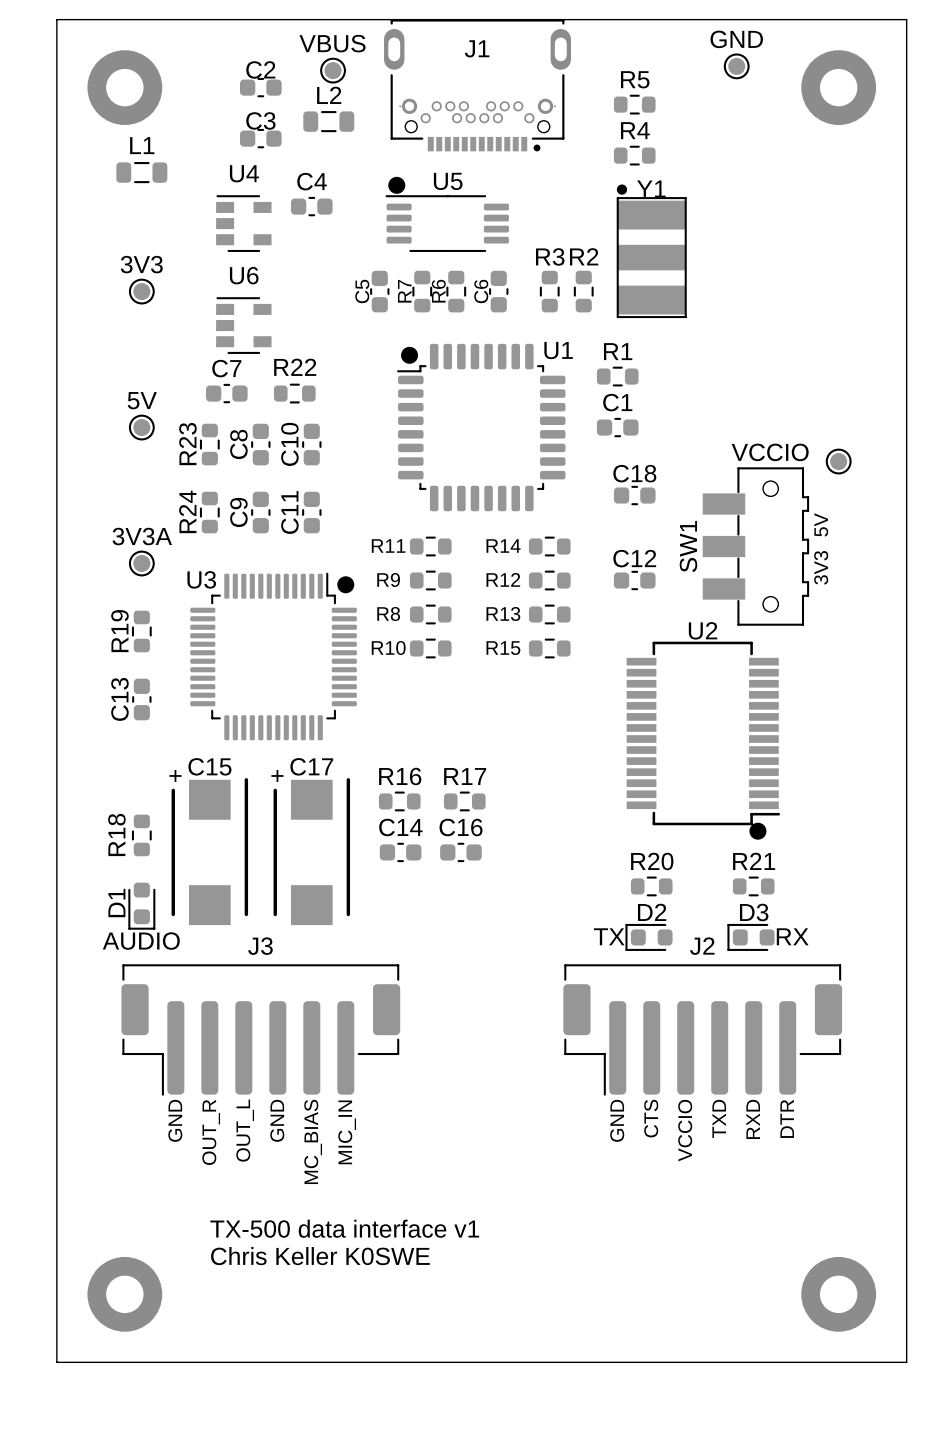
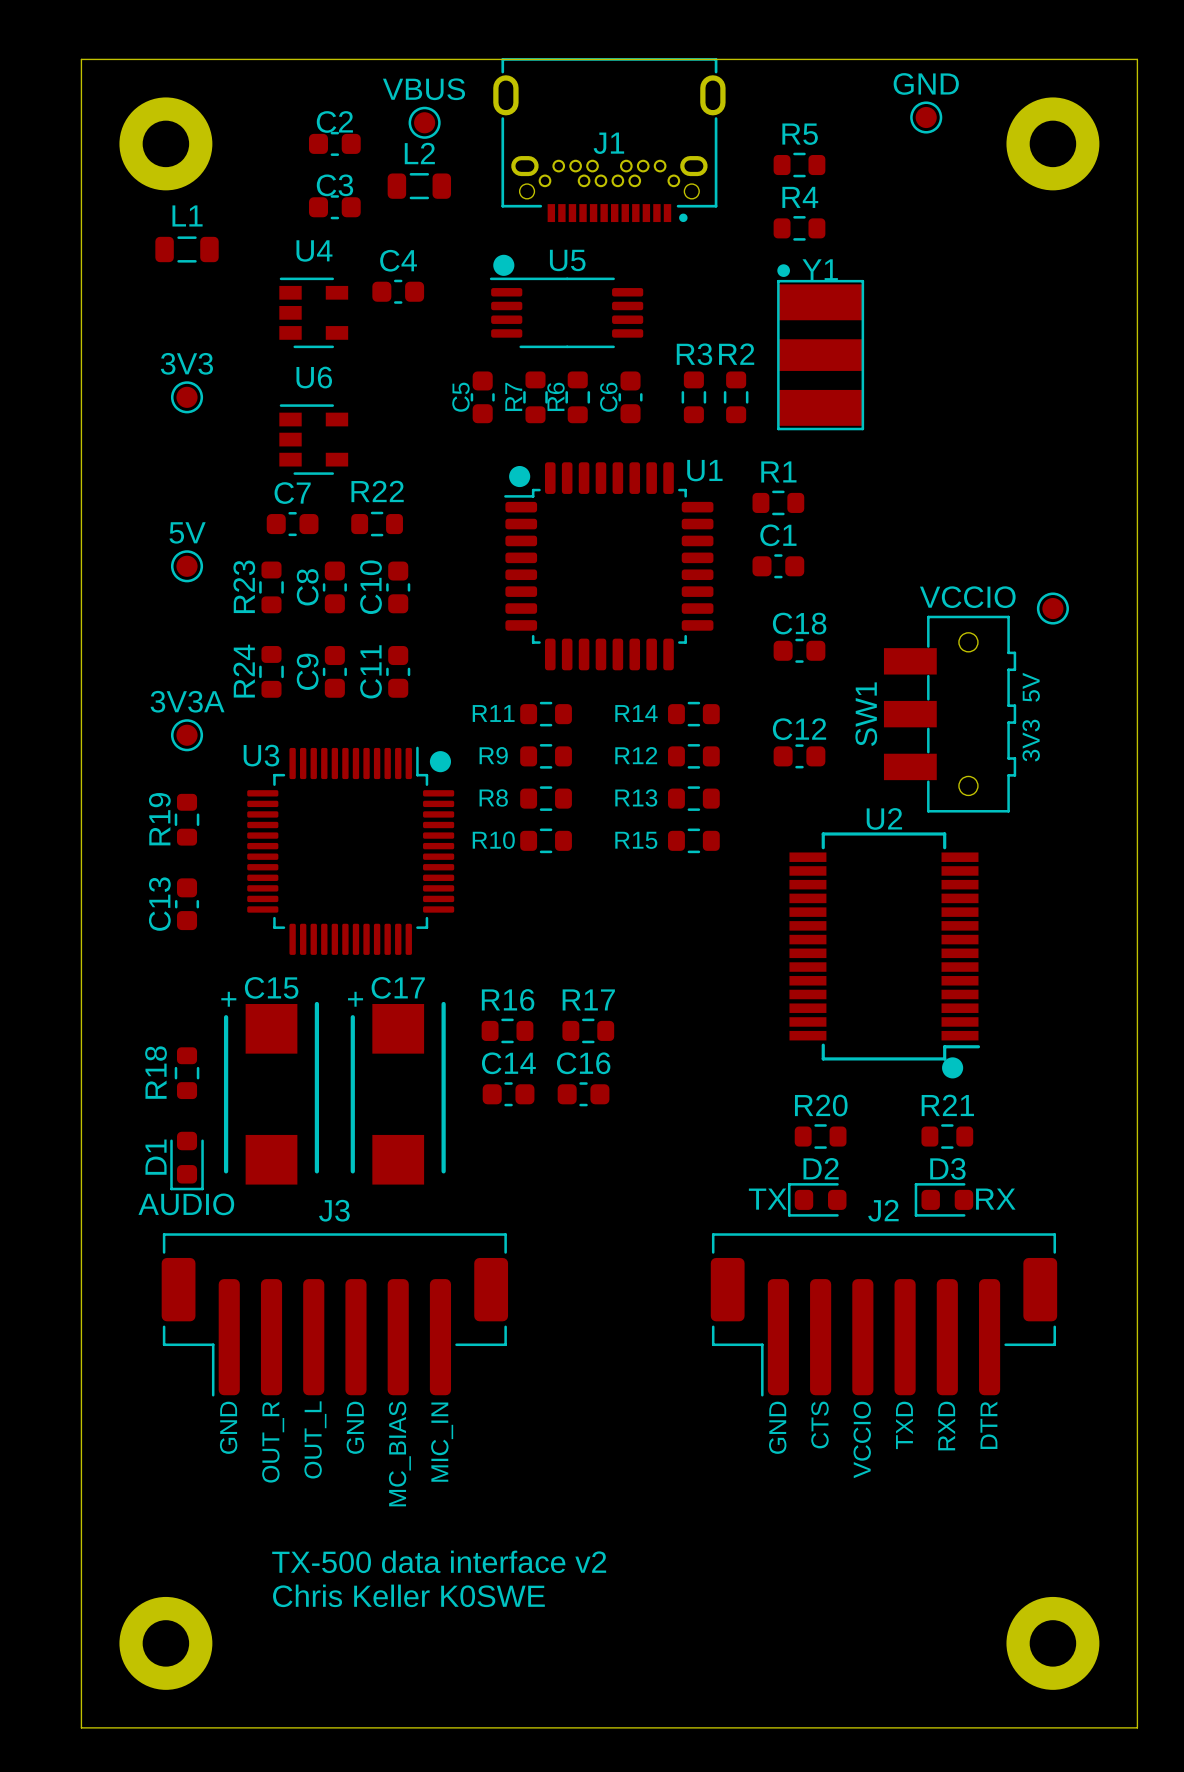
J1 footprint: [384, 19, 571, 152] -> [493, 58, 726, 223]
J1 name position: J1 (477, 48) -> J1 (608, 143)
text: TX-500 data interface v1 (344, 1228) -> TX-500 data interface v2 (439, 1561)

